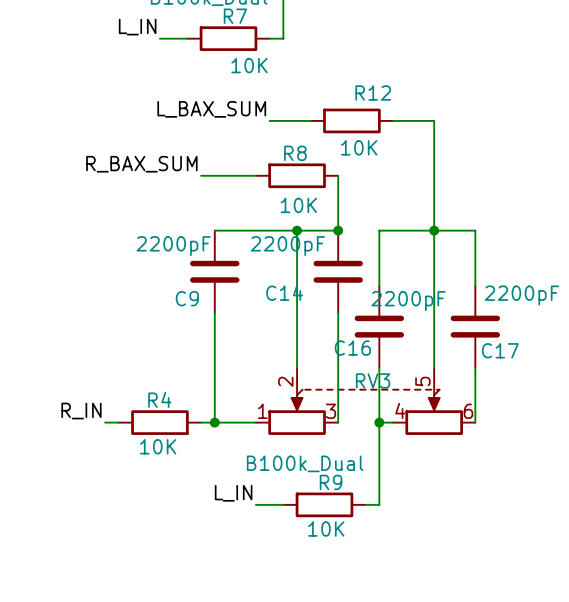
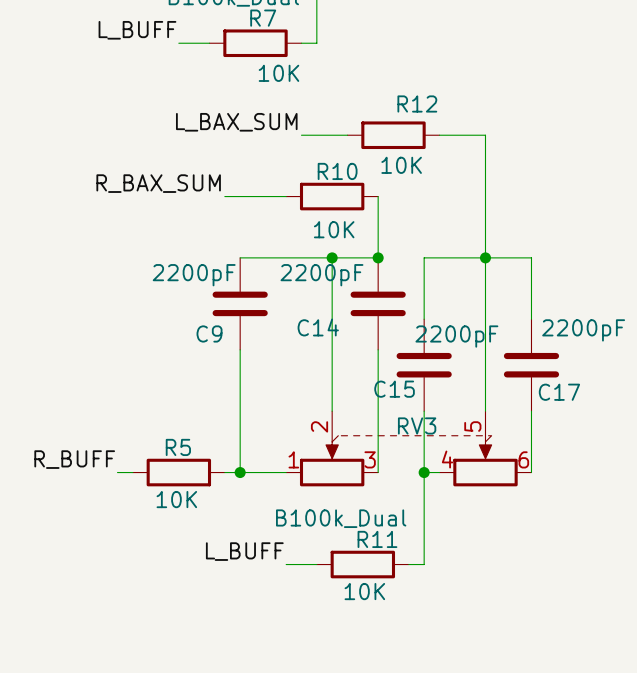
label: L_IN (137, 27) -> L_BUFF (137, 30)
R8 name: R8 (295, 153) -> R10 (337, 171)
C16 name: C16 (352, 348) -> C15 (394, 389)
R4 name: R4 (159, 399) -> R5 (178, 447)
label: R_IN (81, 411) -> R_BUFF (74, 459)
R9 name: R9 (331, 482) -> R11 (377, 539)
label: L_IN (233, 493) -> L_BUFF (244, 551)

